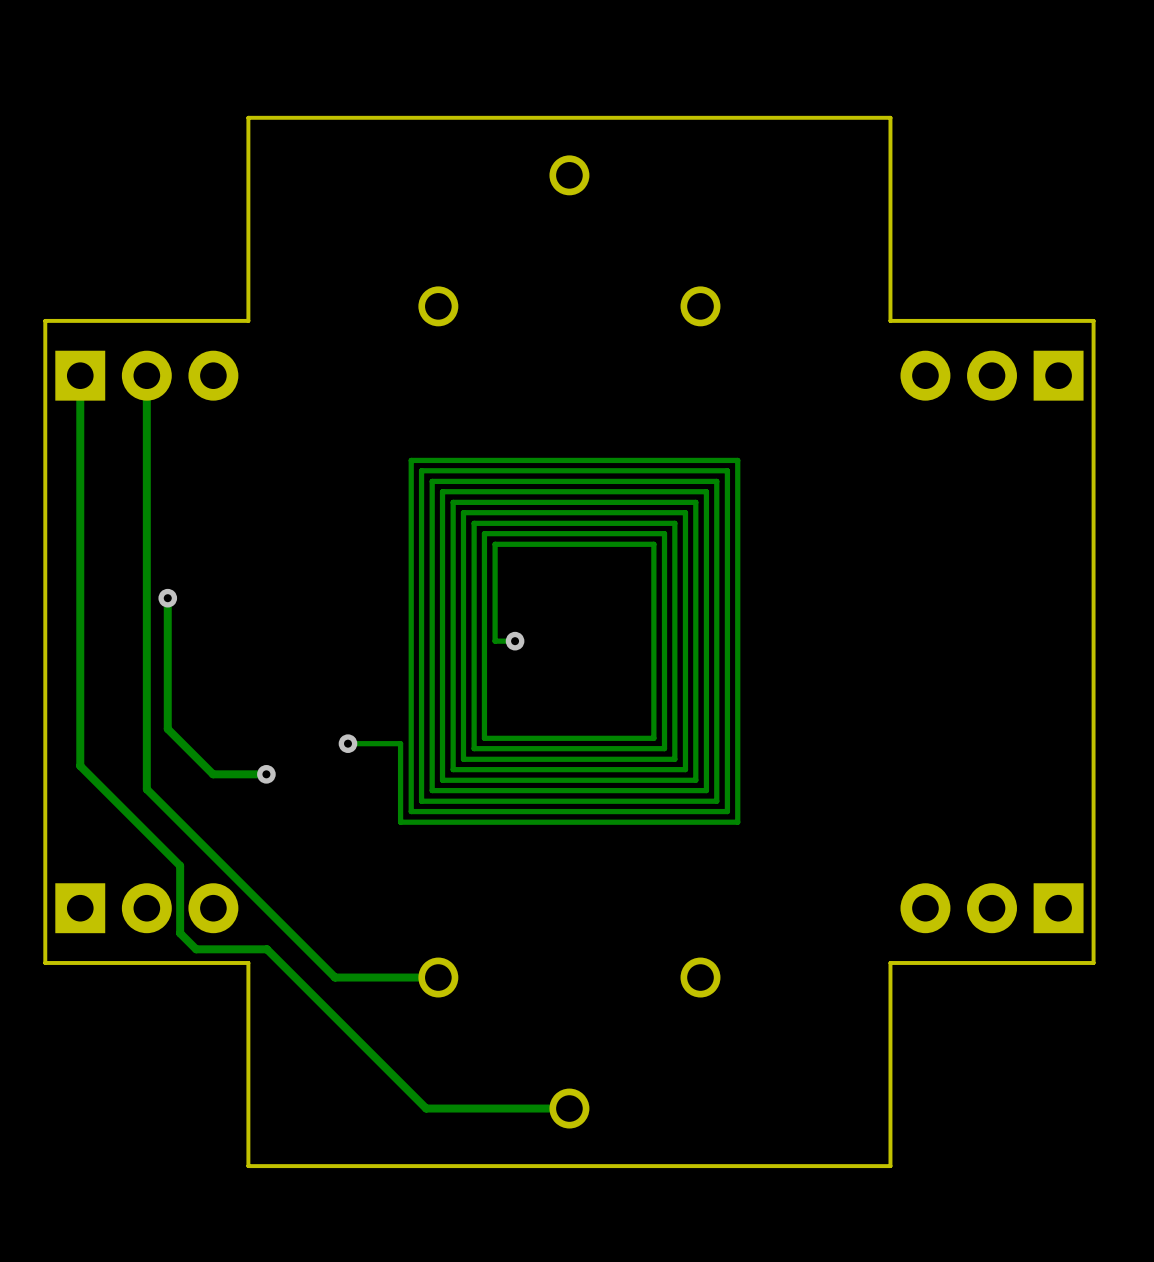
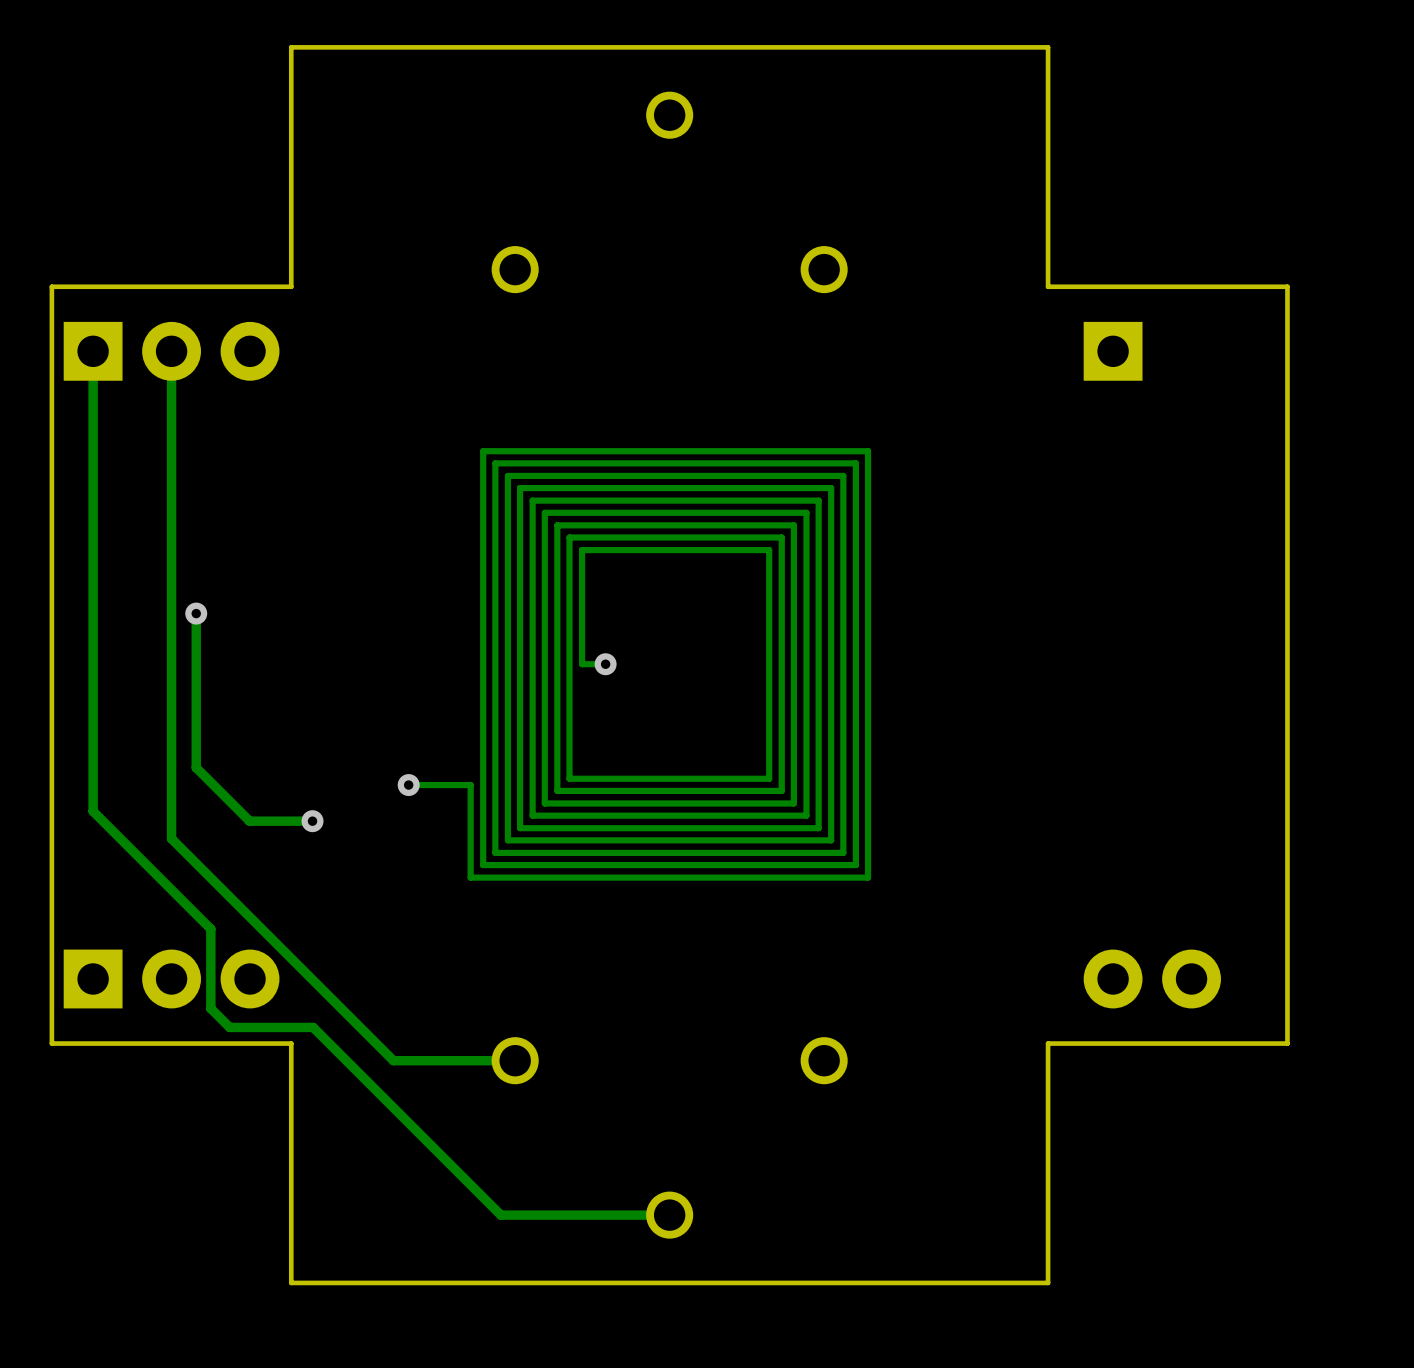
part: none -> (1113, 351)
part: (992, 375) -> none
part footprint: [900, 883, 1084, 934] -> [1162, 949, 1221, 1009]
part: none -> (1113, 978)

